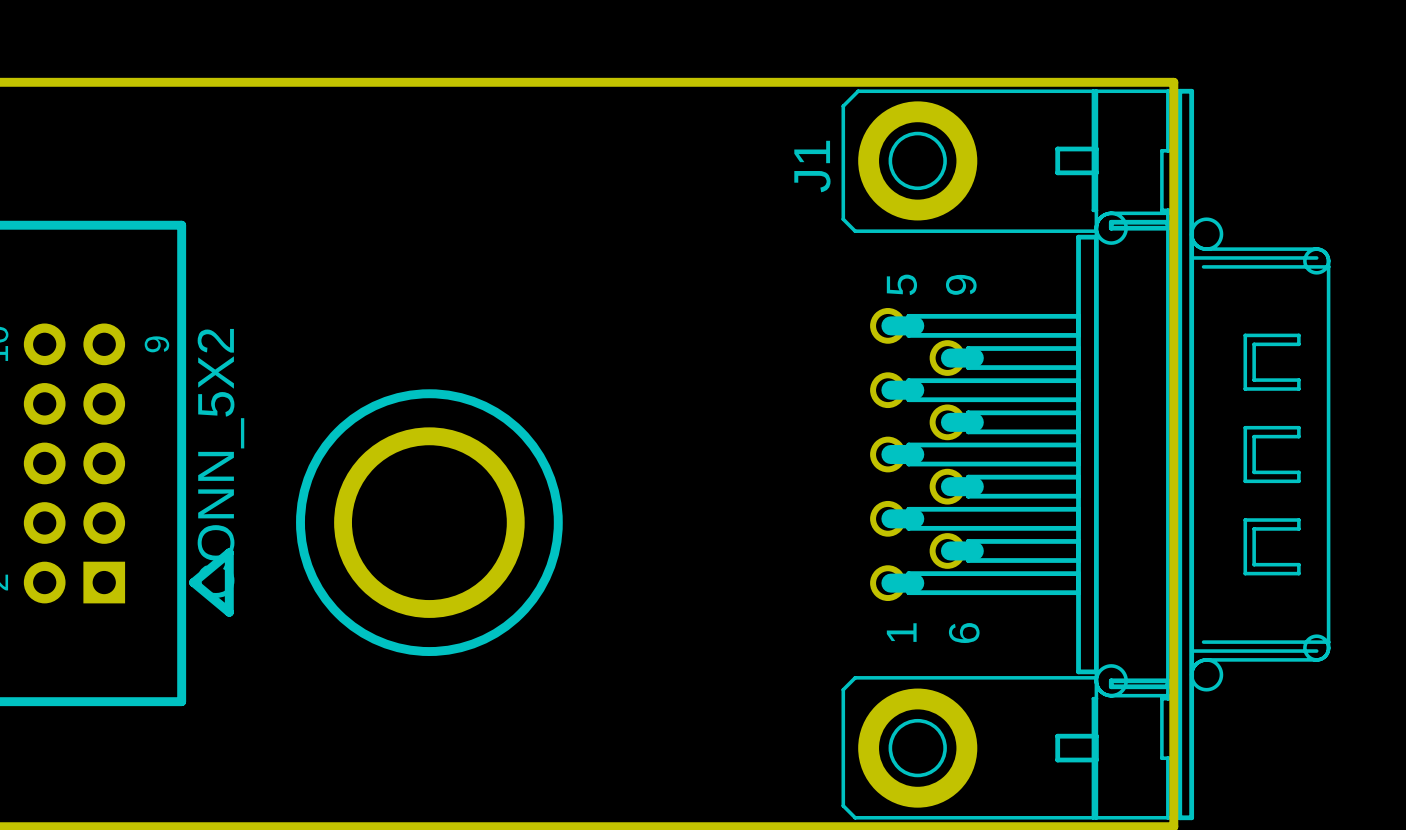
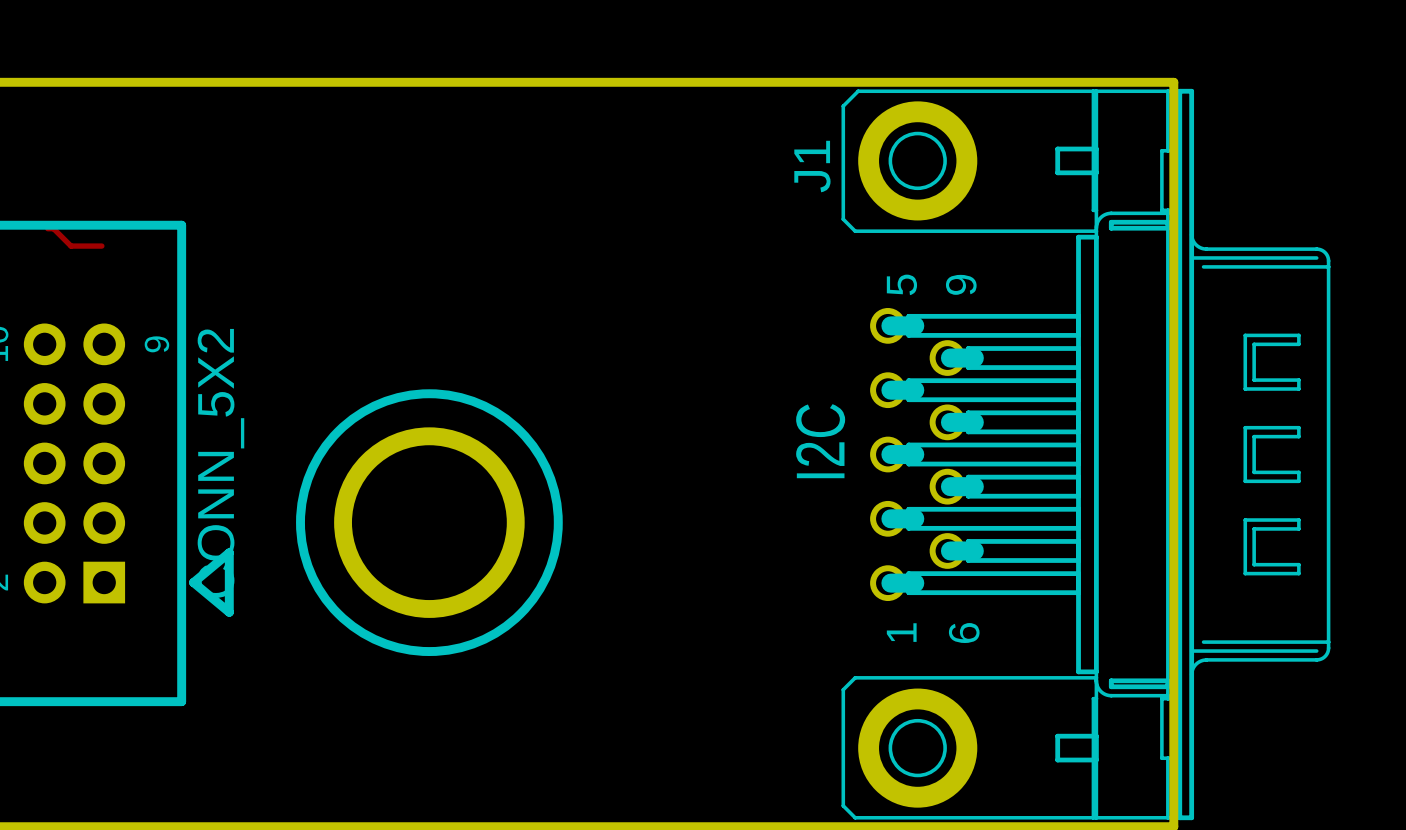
J1 footprint: [841, 88, 1331, 821] -> [841, 88, 1331, 821]
track: none -> (47, 228) (53, 228) (71, 246) (101, 246)
text: none -> I2C (820, 441)

